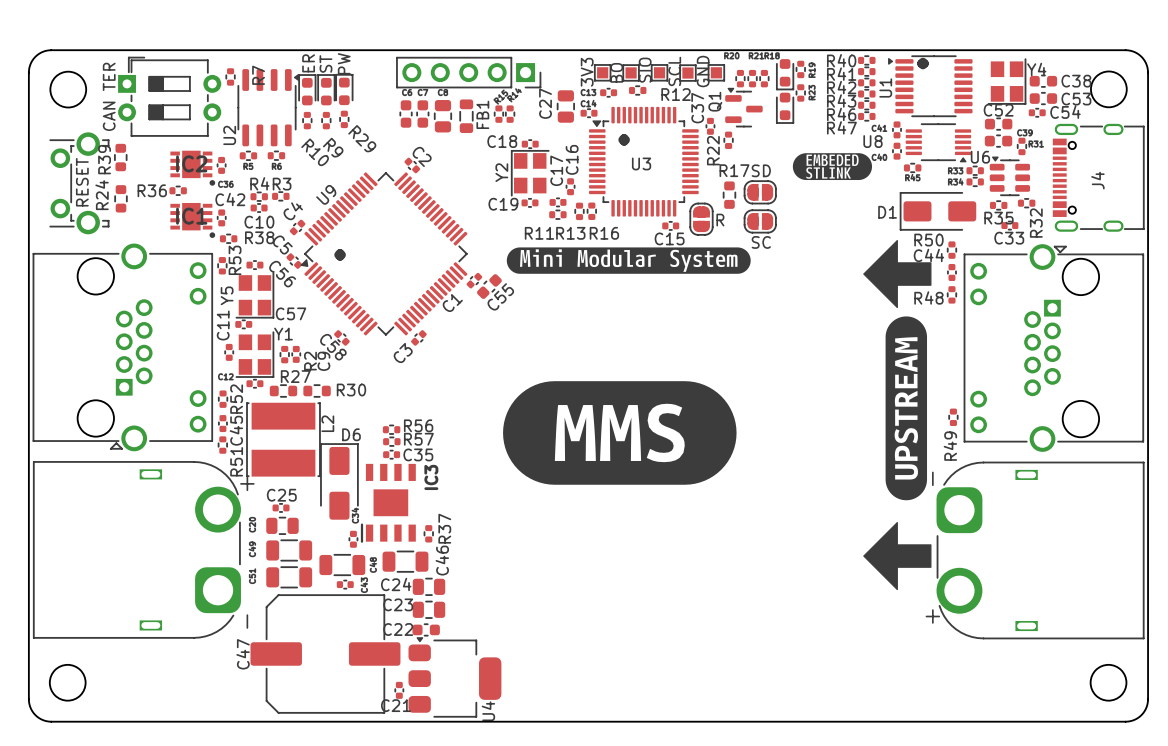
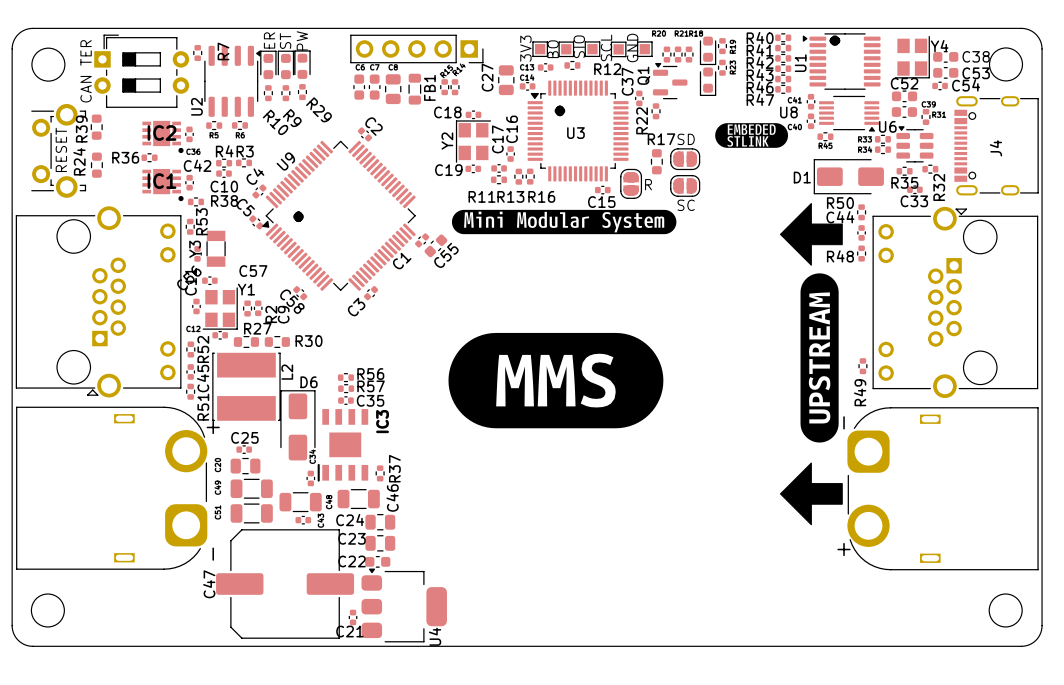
C56 rotation: 0° (254, 265) -> 90° clockwise (197, 253)
C56 position: (254, 265) -> (197, 253)
Y3: none -> (216, 248)
Y5: (254, 295) -> none

